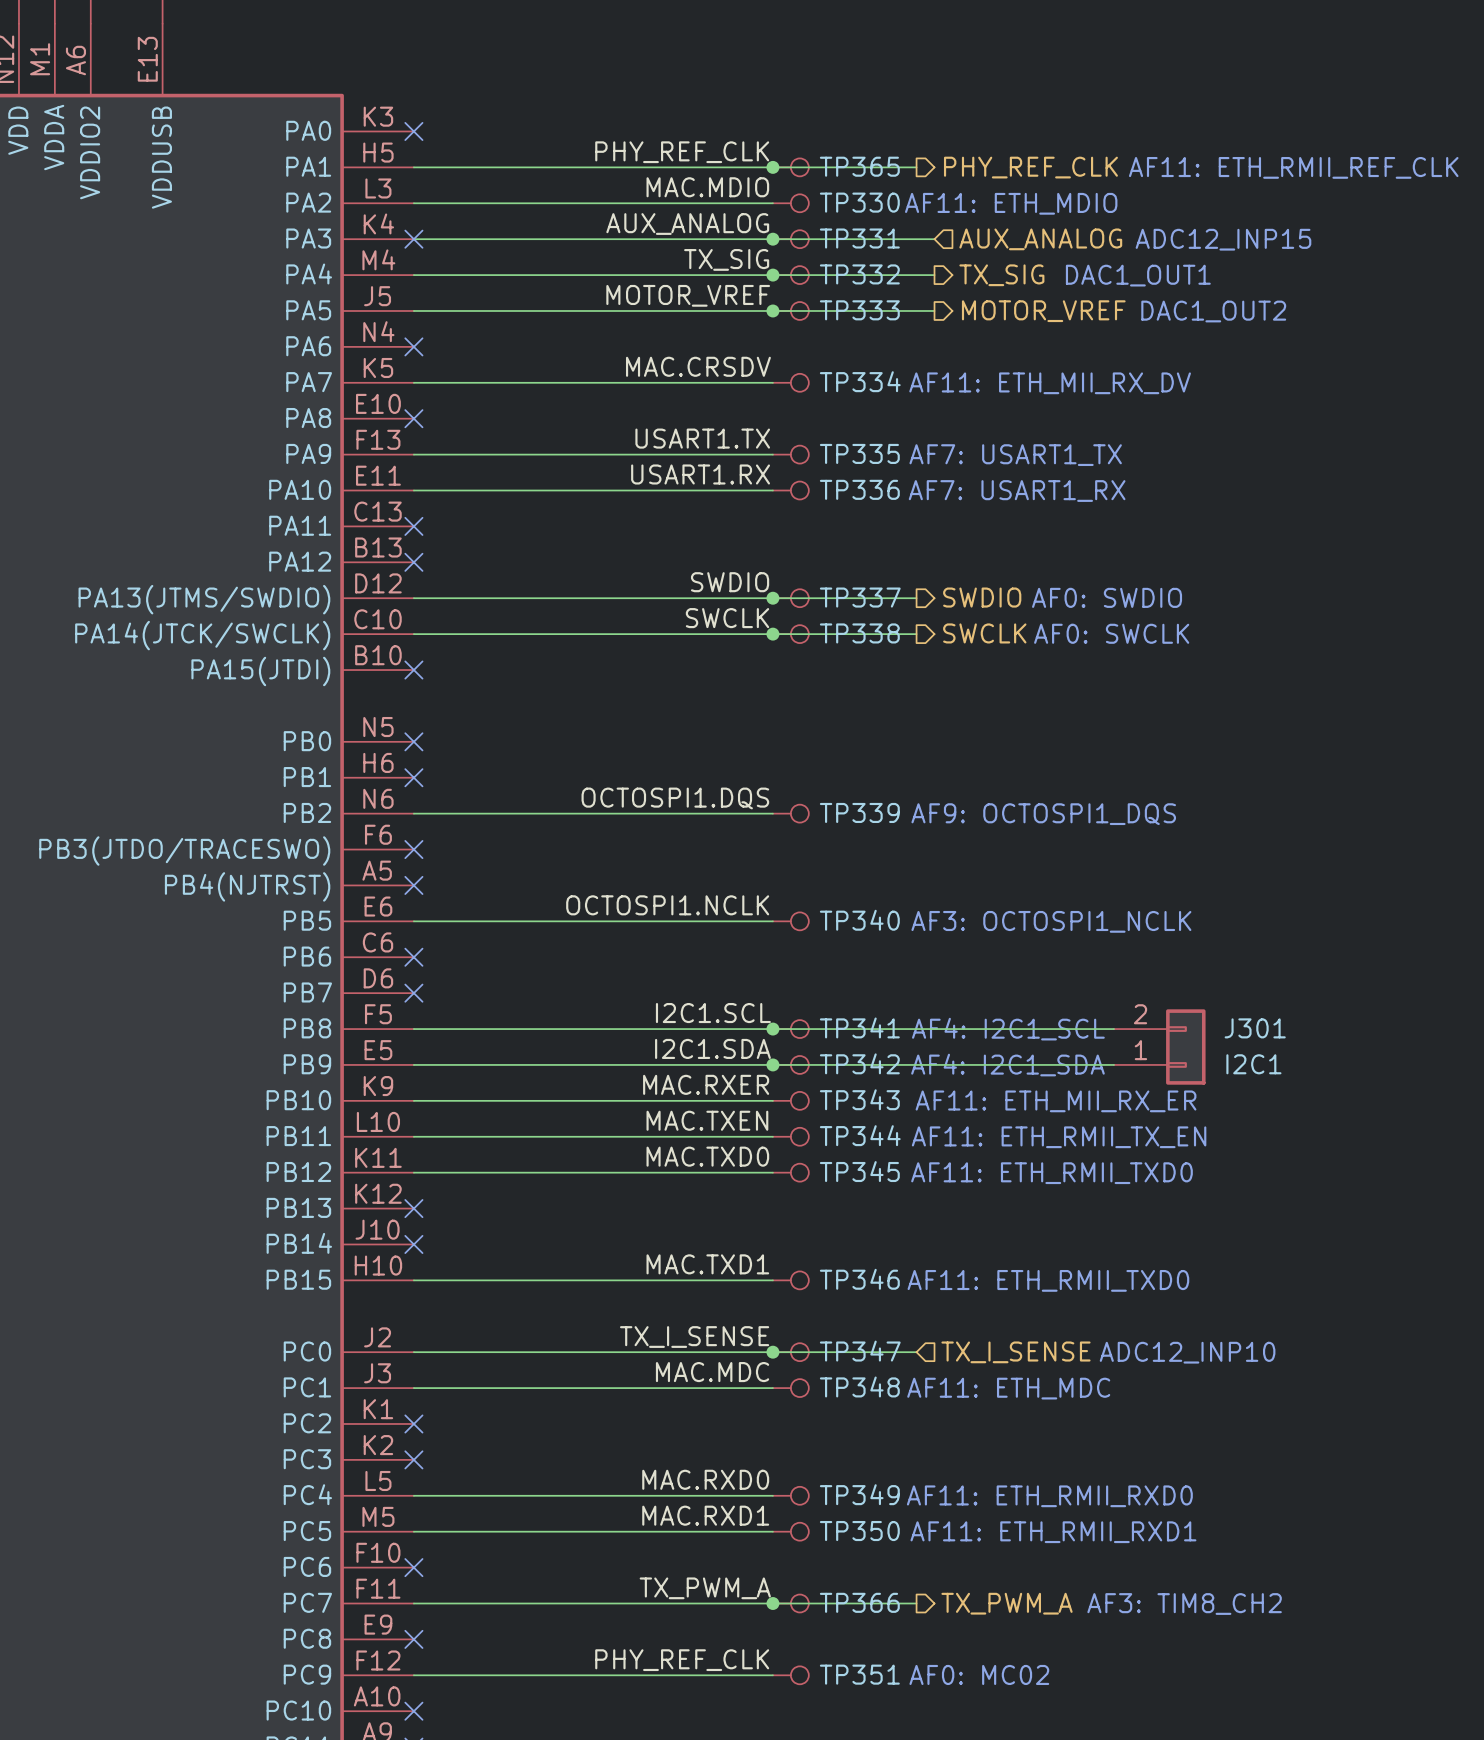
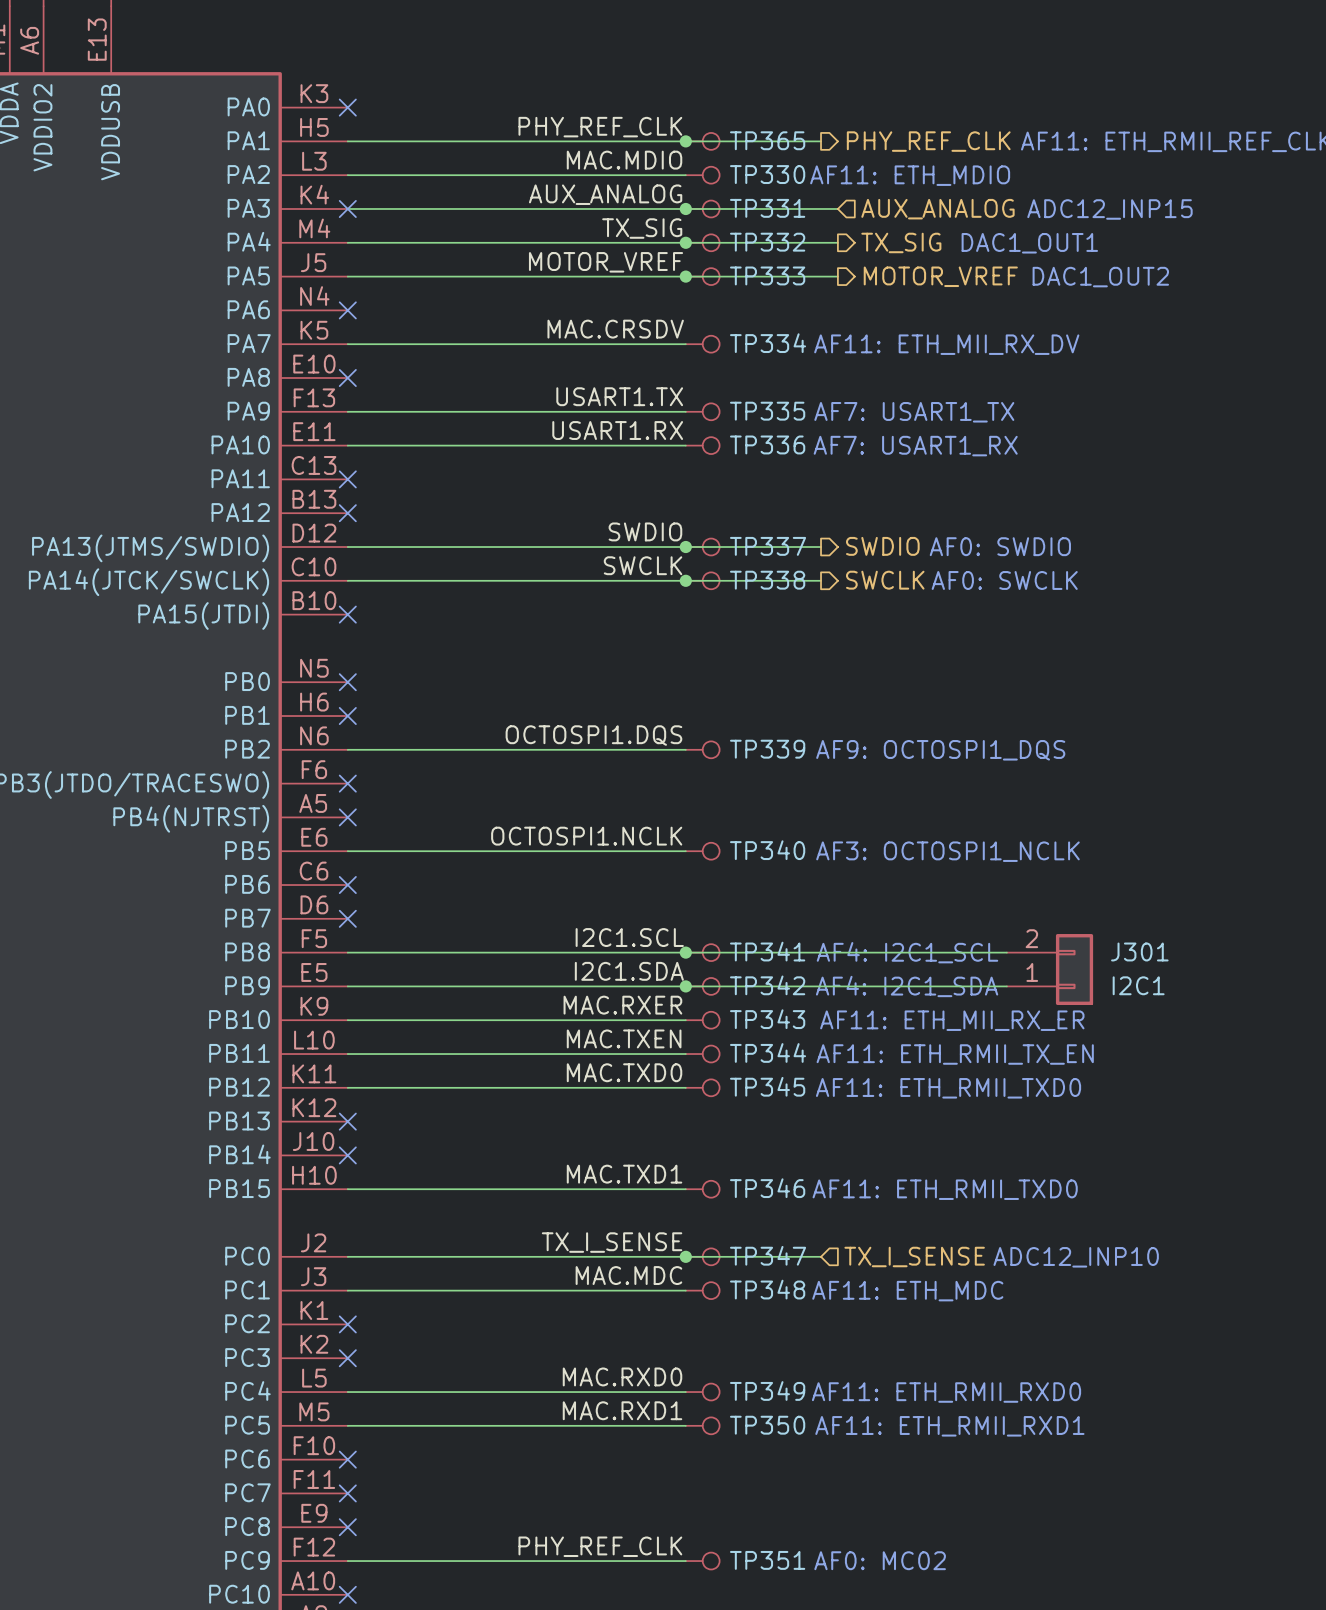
label: TX_PWM_A (705, 1588) -> none
wire: (413, 1603) (916, 1603) -> none
no-connect mark: none -> (347, 1493)
junction: (772, 1603) -> none
TP366: (790, 1603) -> none
hierarchical label: TX_PWM_A (1007, 1603) -> none
text: AF3: TIM8_CH2 (1184, 1604) -> none

